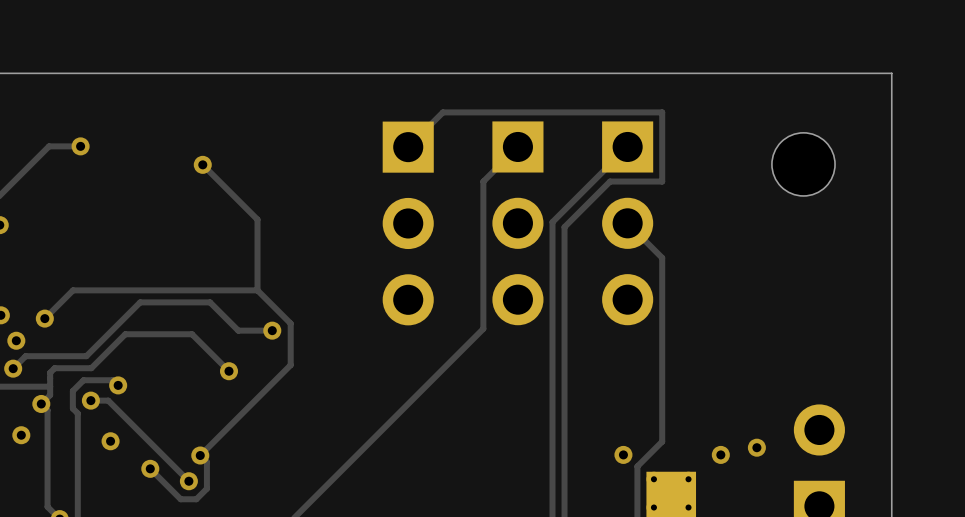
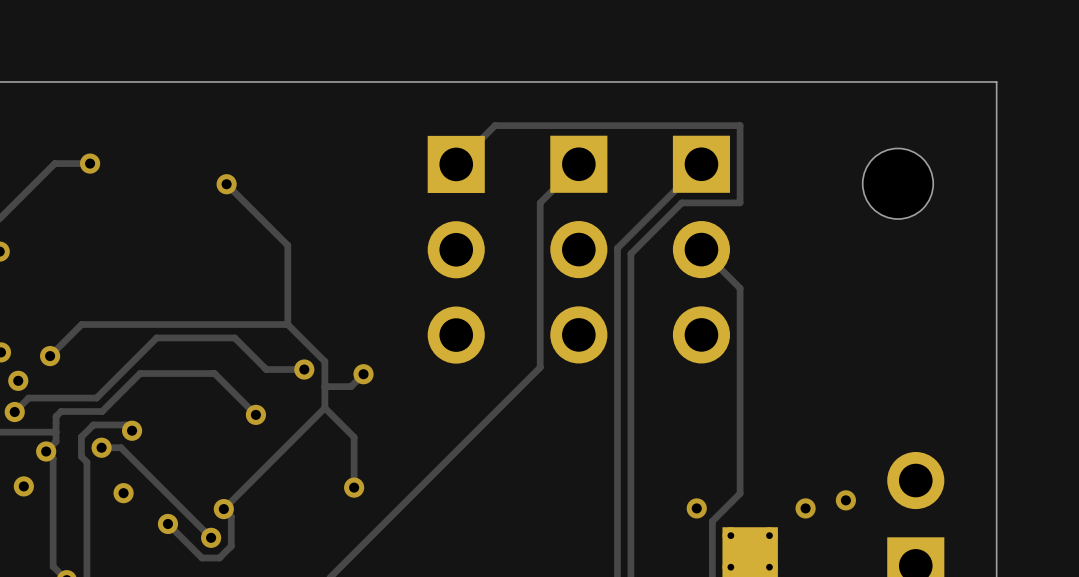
track: none -> (363, 374) (351, 386) (324, 386)
via: none -> (363, 374)
track: none -> (324, 408) (354, 437) (354, 487)
via: none -> (354, 487)

